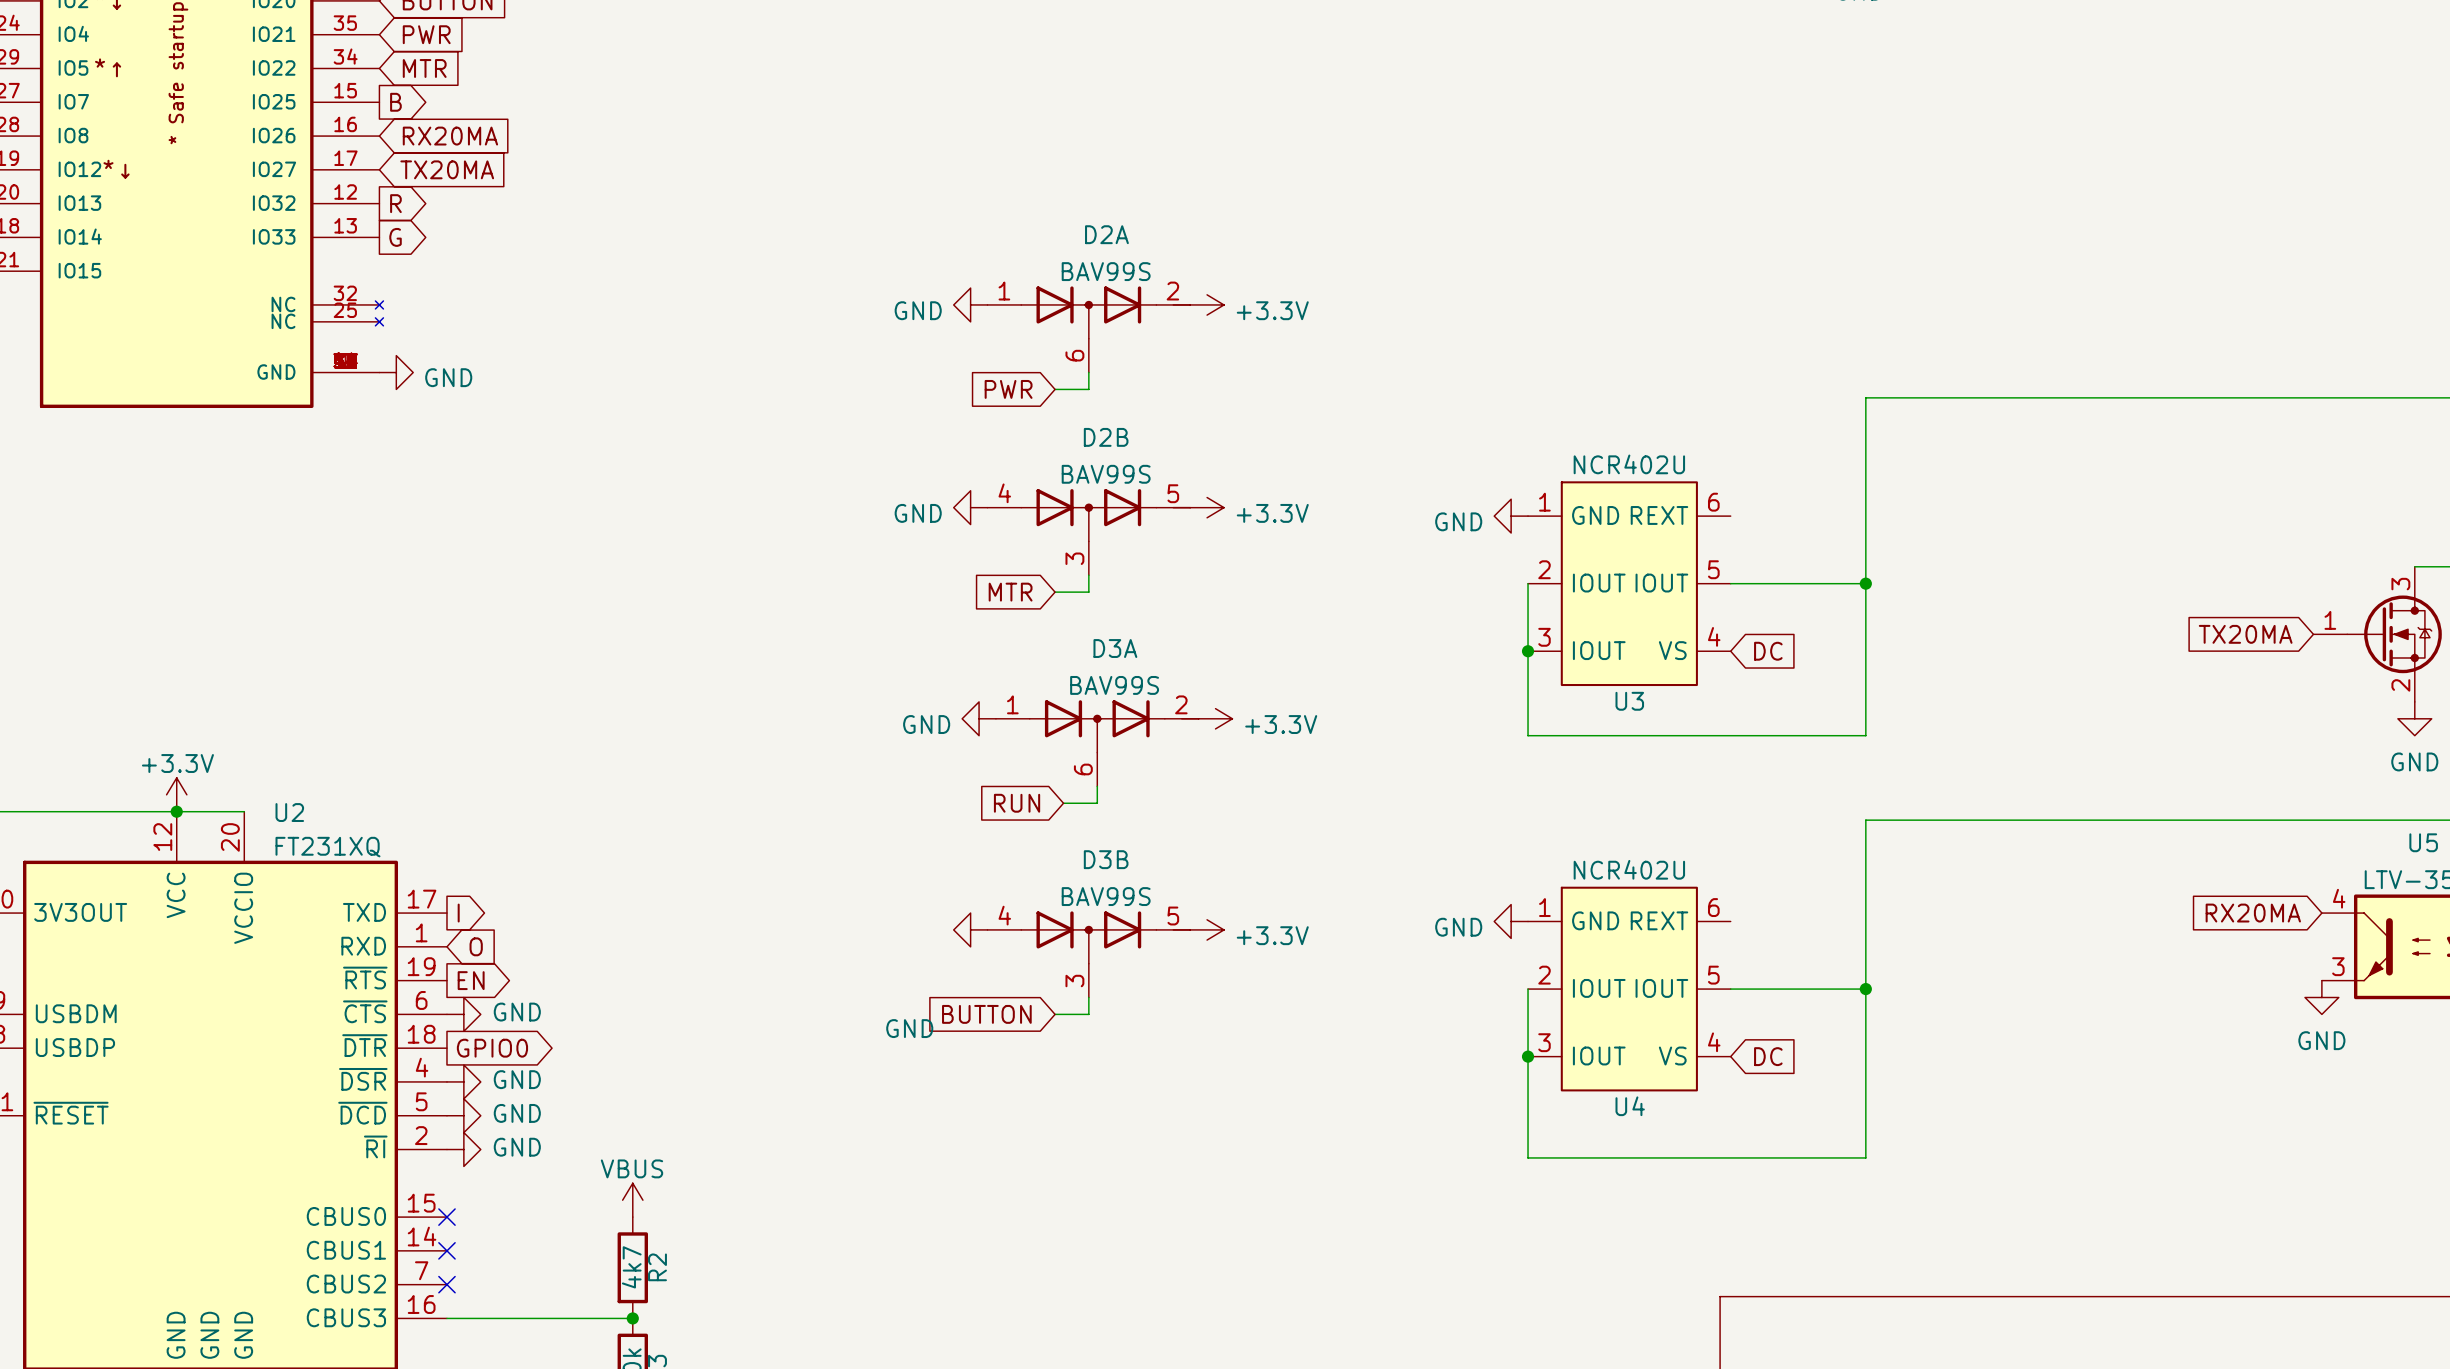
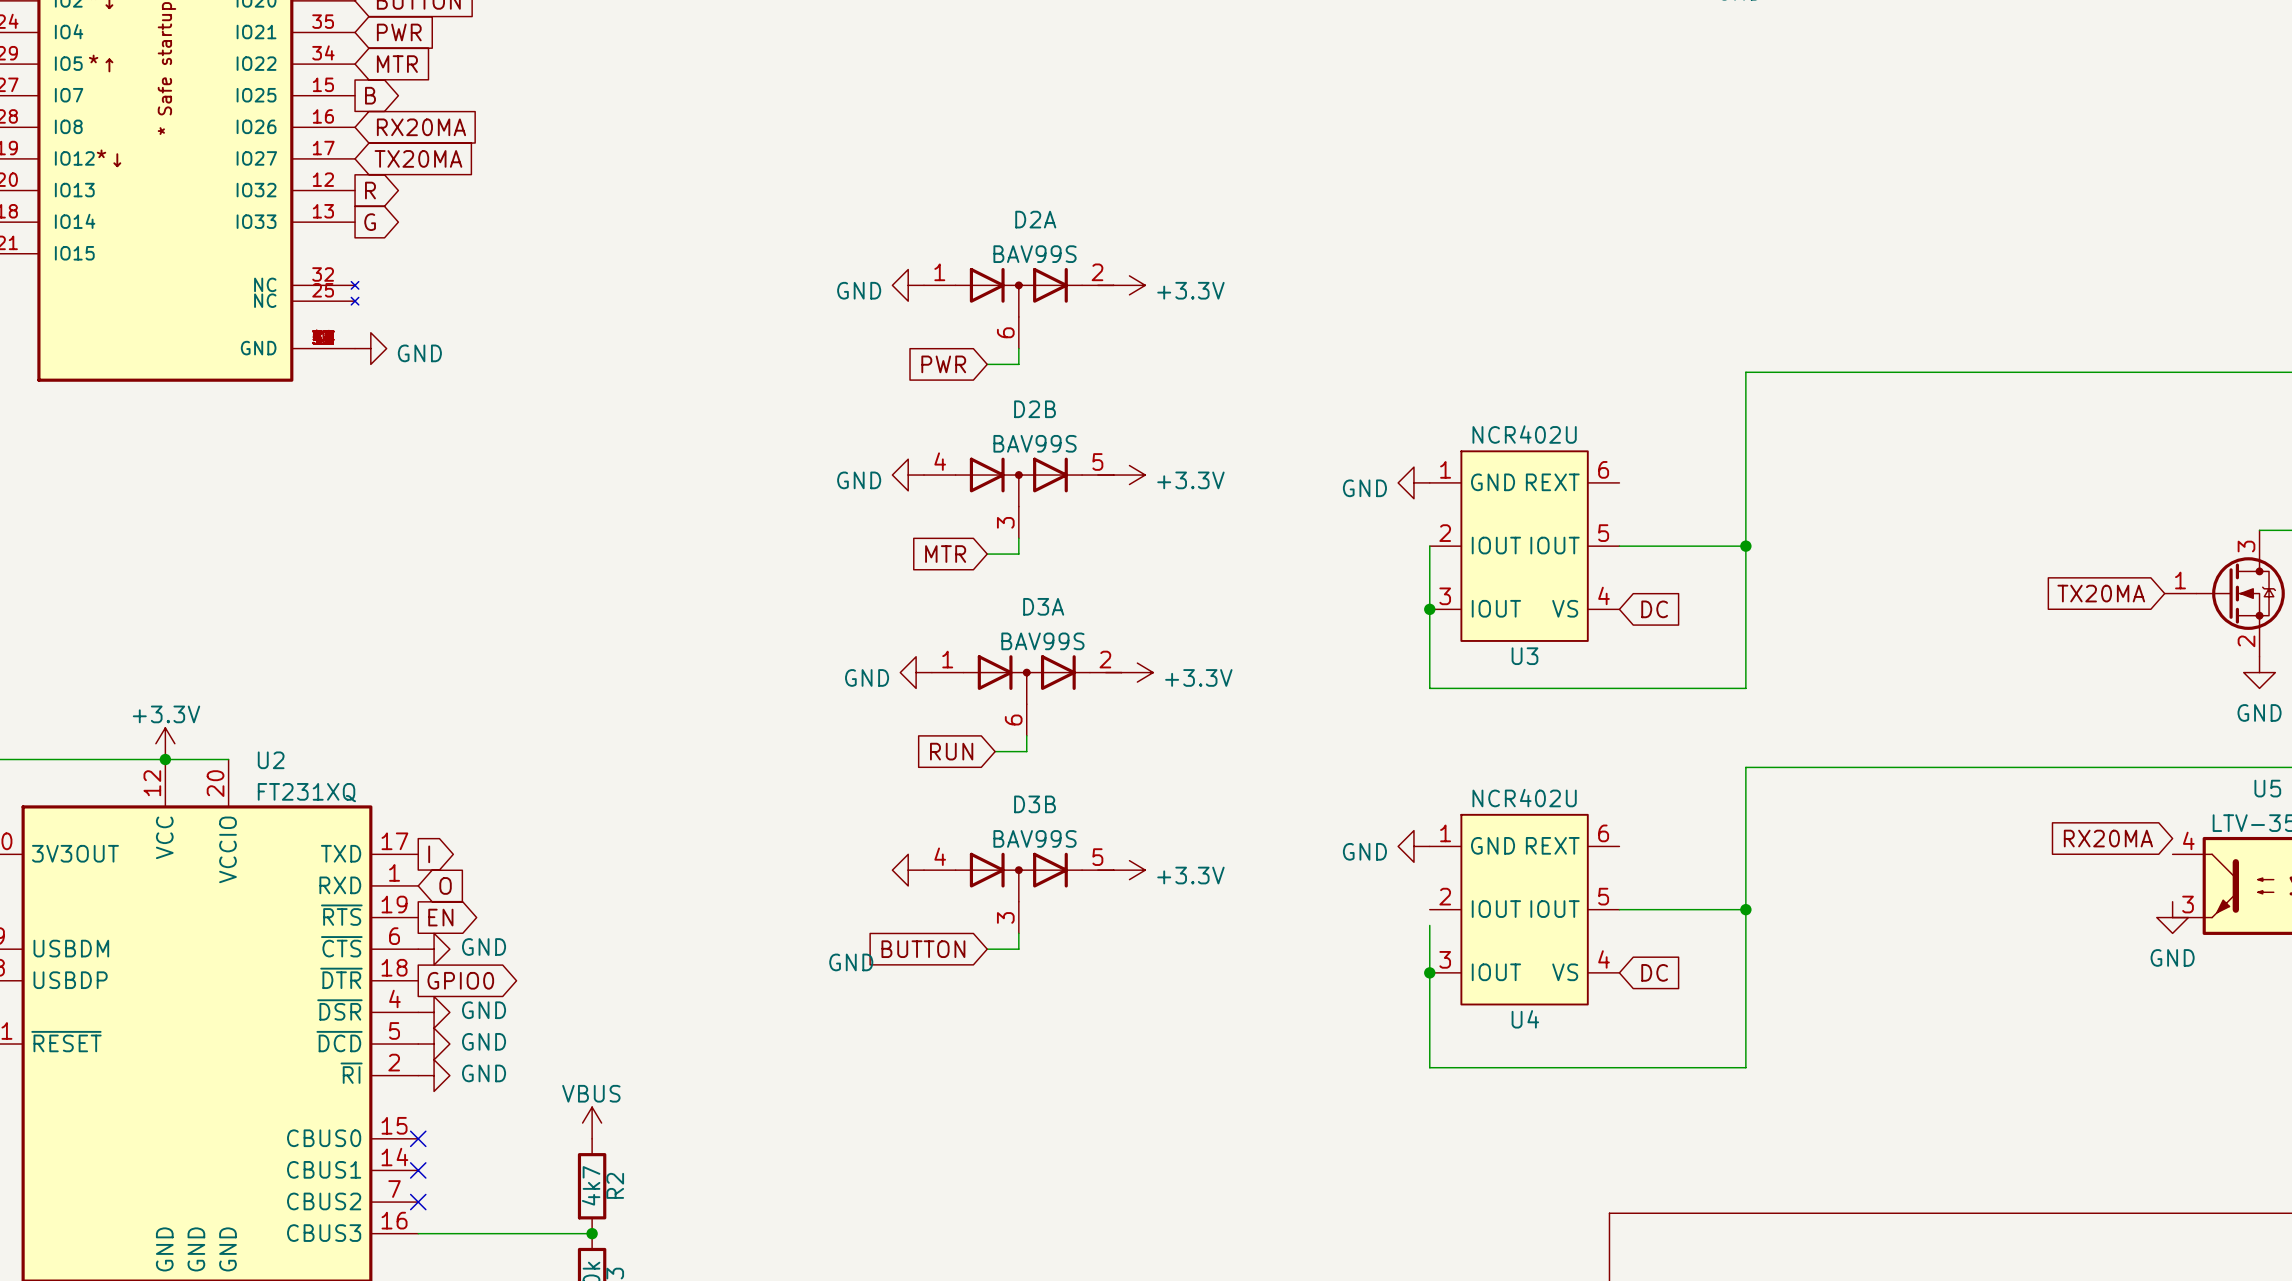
global label position: RX20MA (2253, 913) -> RX20MA (2108, 838)
power symbol position: GND (1511, 921) -> GND (1413, 846)
U4 position: (1629, 989) -> (1524, 909)
wire: (1730, 989) (1865, 989) -> (1619, 909) (1745, 909)
junction position: (1865, 989) -> (1745, 909)
power symbol position: GND (2321, 997) -> GND (2172, 917)
junction position: (1528, 1056) -> (1429, 972)
global label position: DC (1768, 1056) -> DC (1654, 972)
wire: (1528, 1141) (1528, 1157) (1865, 1157) (1865, 1141) -> (1429, 1067) (1745, 1067)

